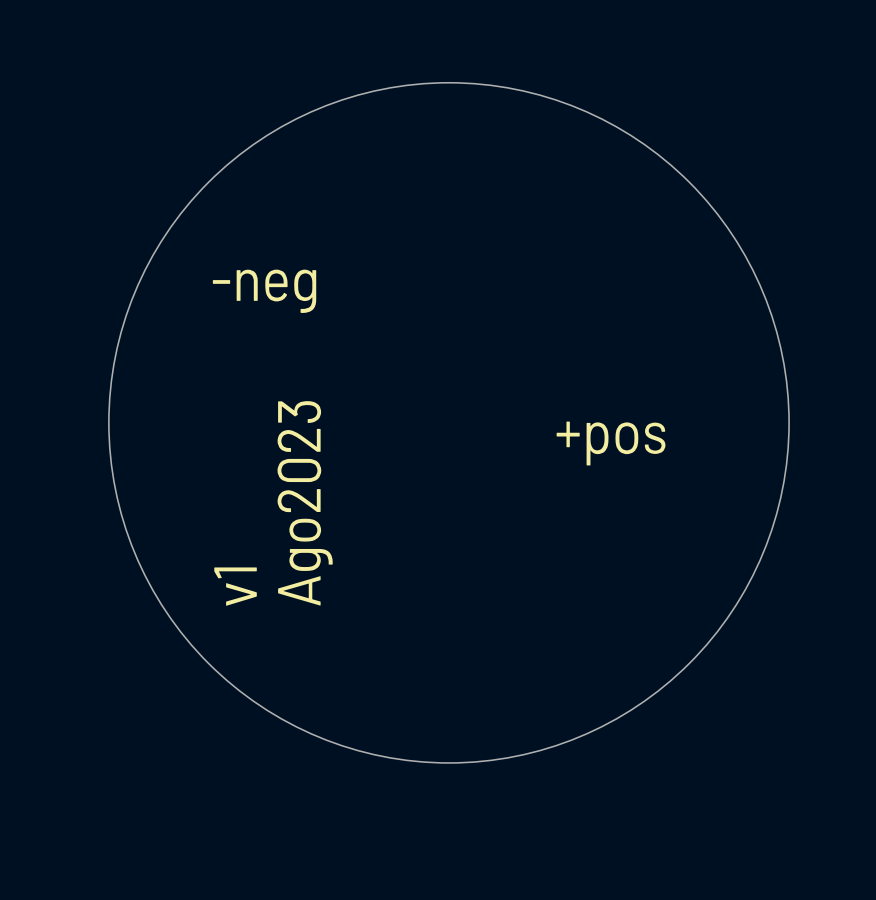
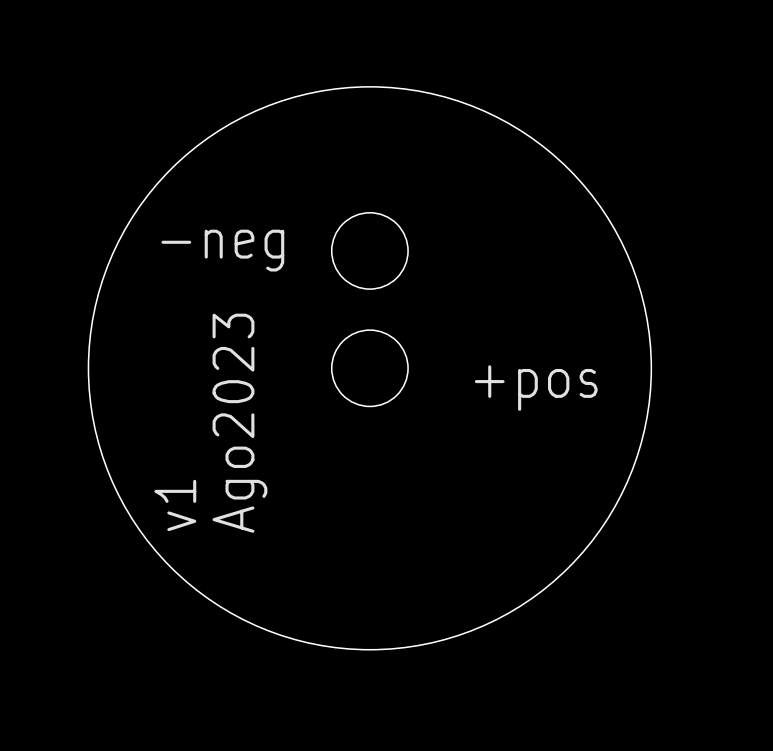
drawing: [108, 82, 790, 764] -> none
round board edge: none -> [88, 86, 652, 650]
round board edge: none -> [331, 212, 409, 290]
round board edge: none -> [331, 329, 409, 407]

